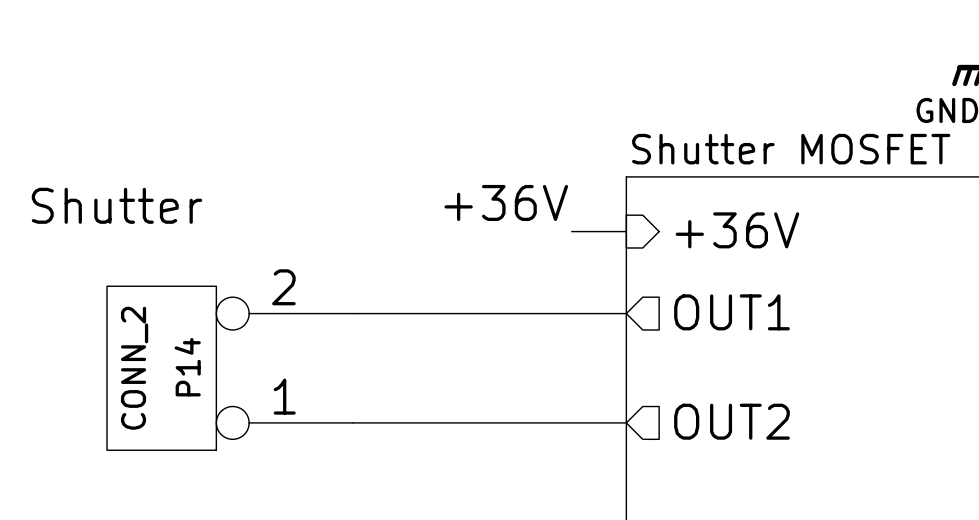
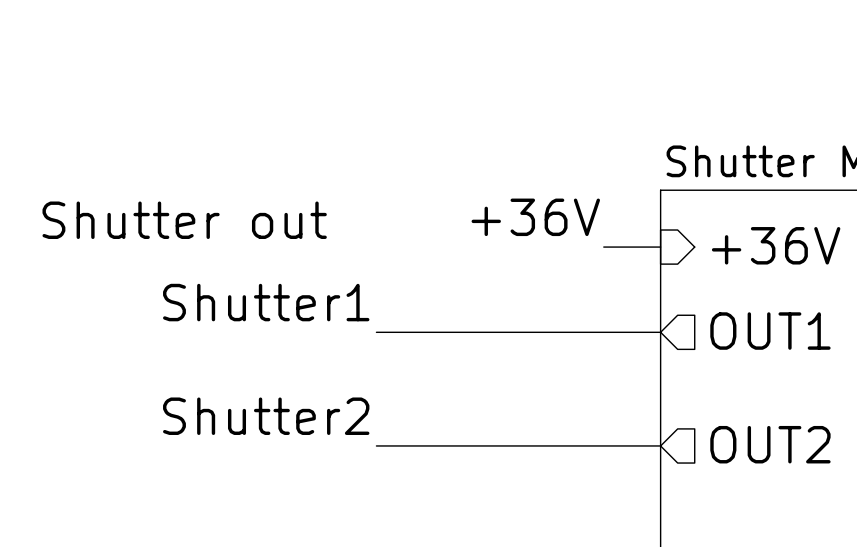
text: Shutter (116, 205) -> Shutter out (184, 220)
label: none -> Shutter1 (266, 302)
P14: CONN_2 (230, 368) -> none
label: none -> Shutter2 (266, 416)

